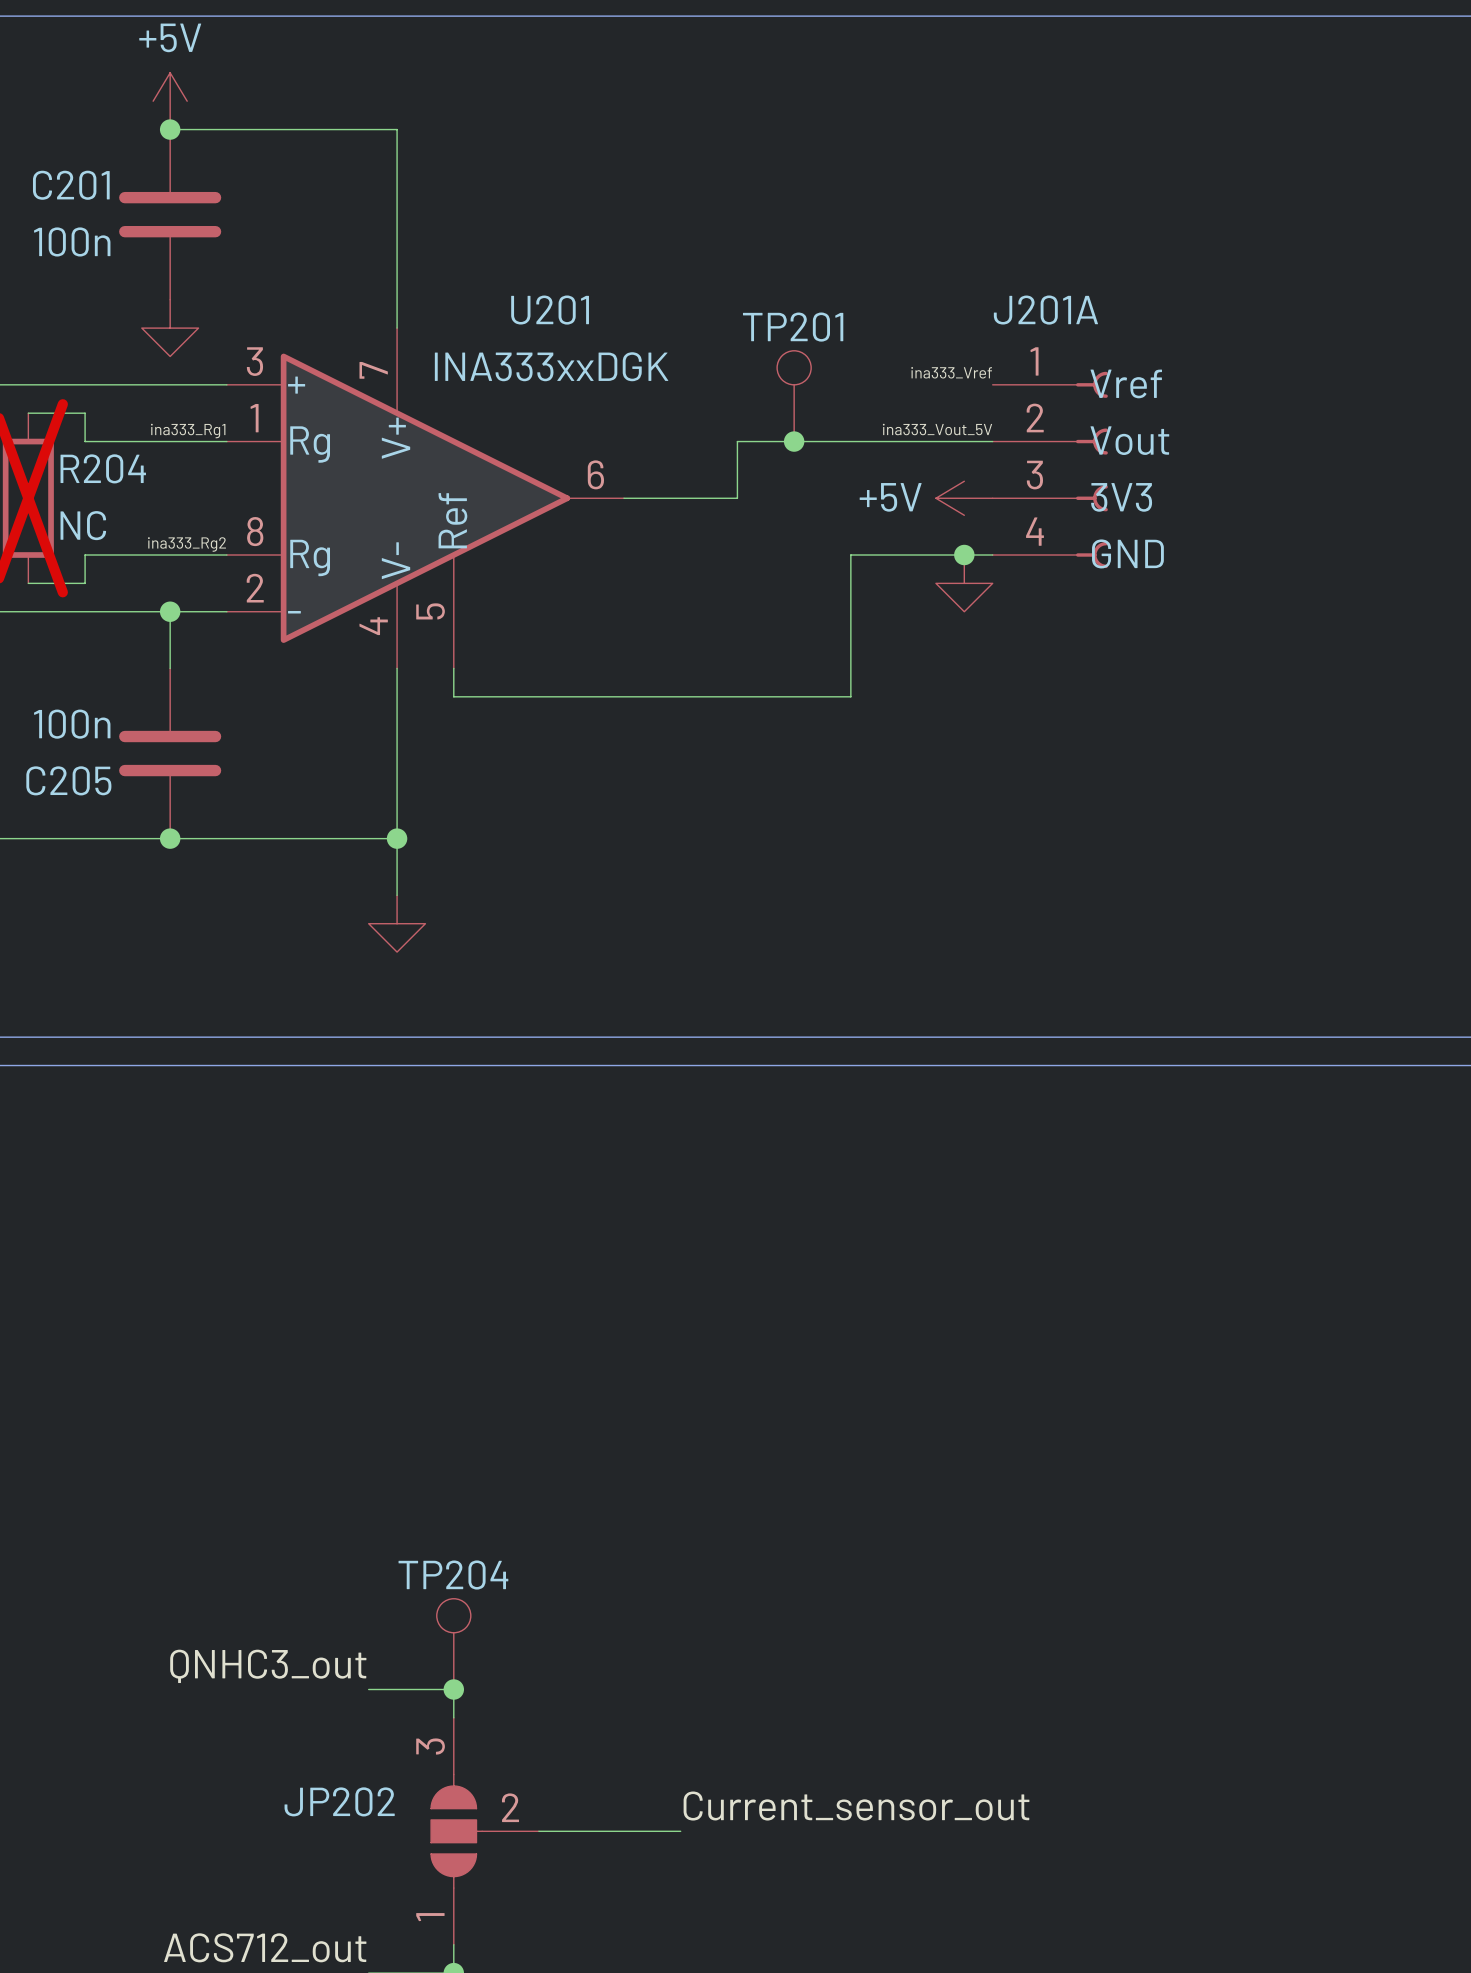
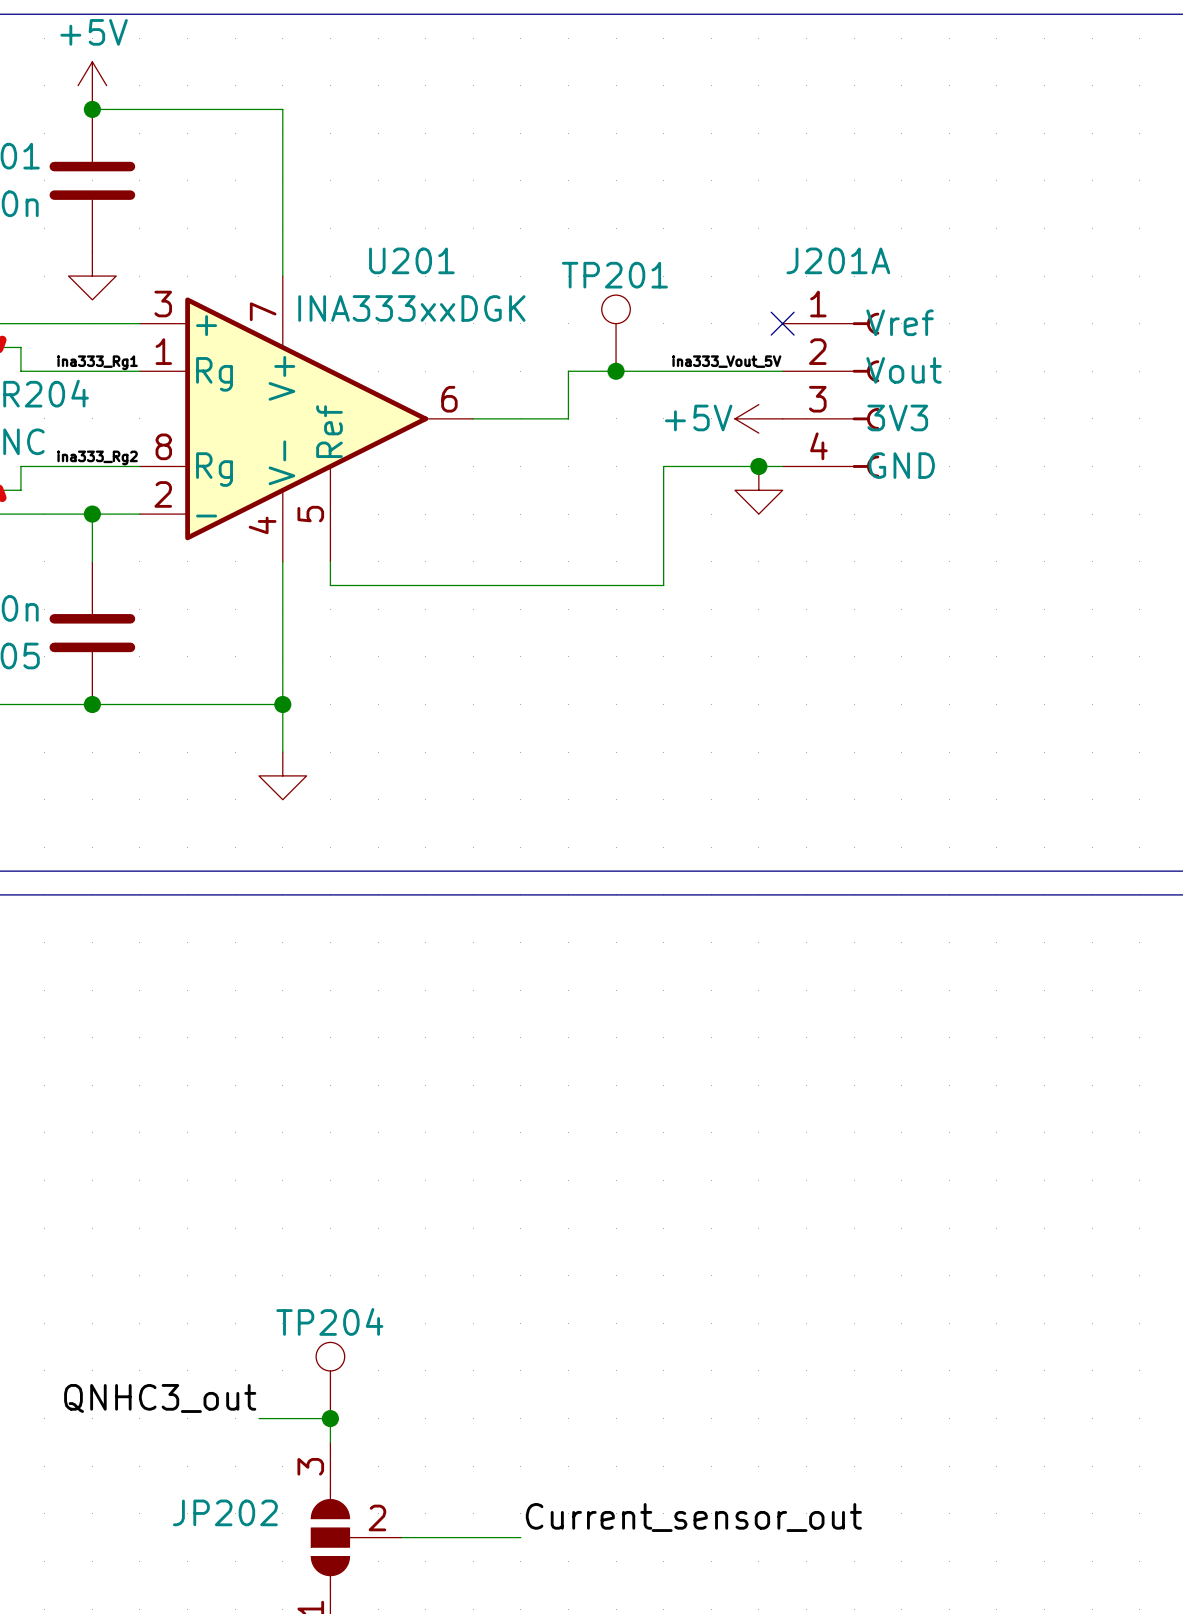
label: ina333_Vref (951, 372) -> none
no-connect mark: none -> (782, 323)

